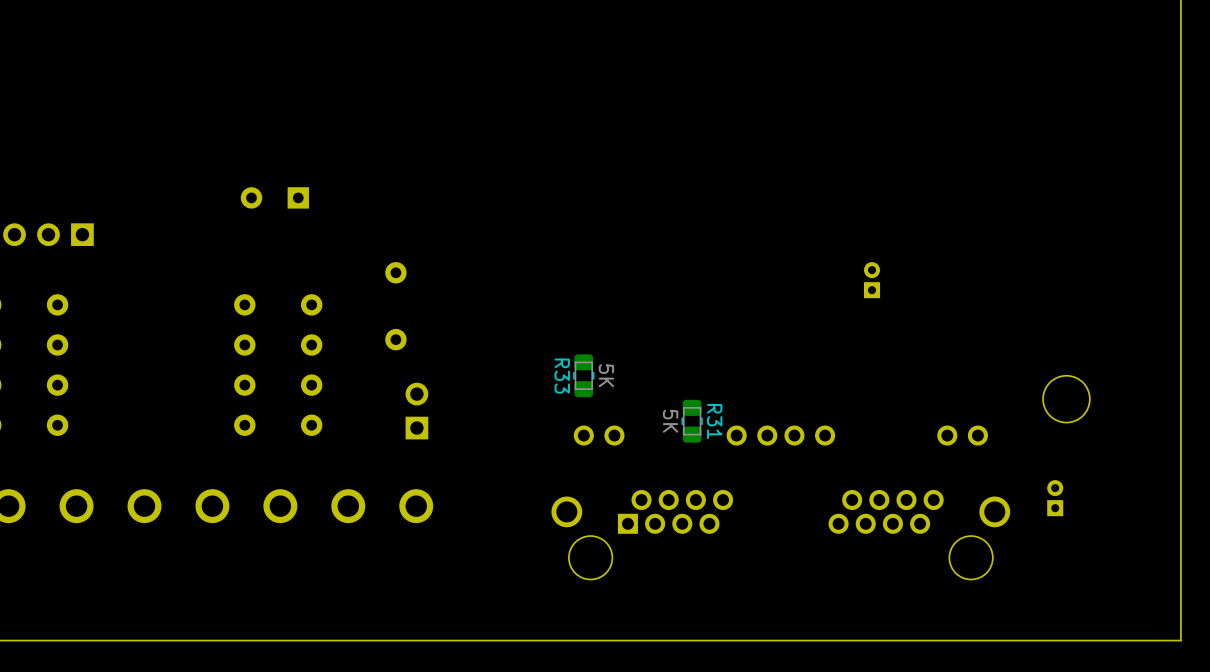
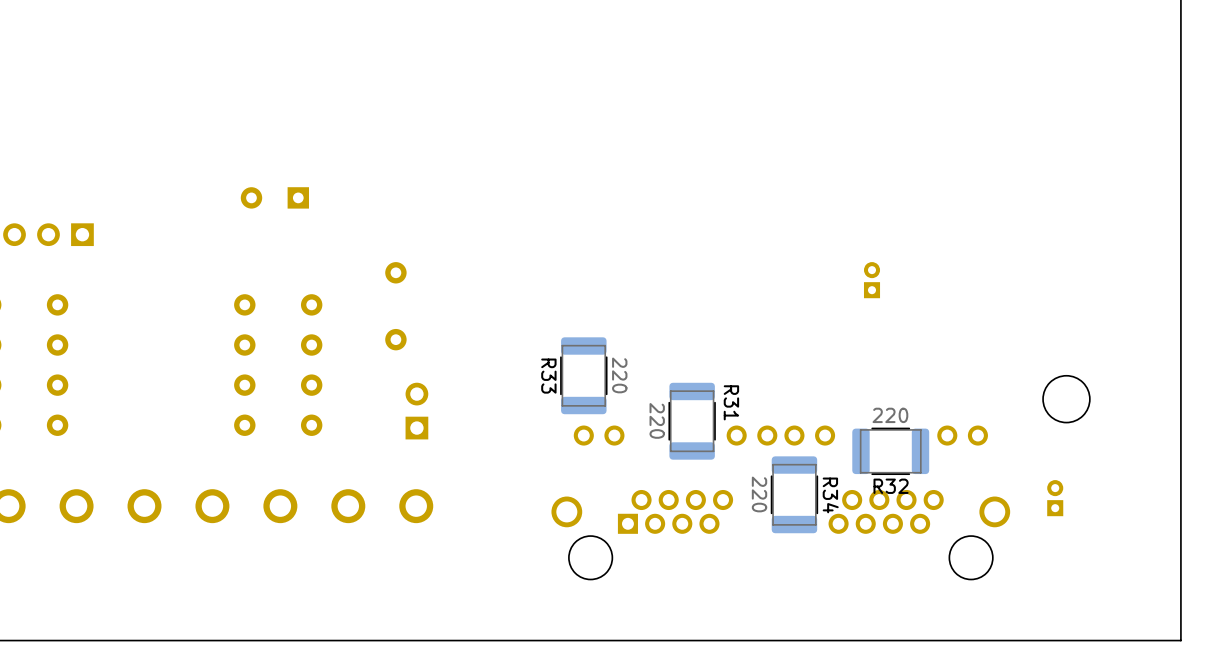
R33 footprint: [573, 354, 595, 398] -> [560, 337, 608, 415]
R33 value: 5K (606, 375) -> 220 (619, 375)
R31 footprint: [681, 399, 703, 443] -> [668, 382, 716, 460]
R31 value: 5K (670, 421) -> 220 (657, 420)
R32: none -> 220 (890, 451)
R34: none -> 220 (794, 494)

